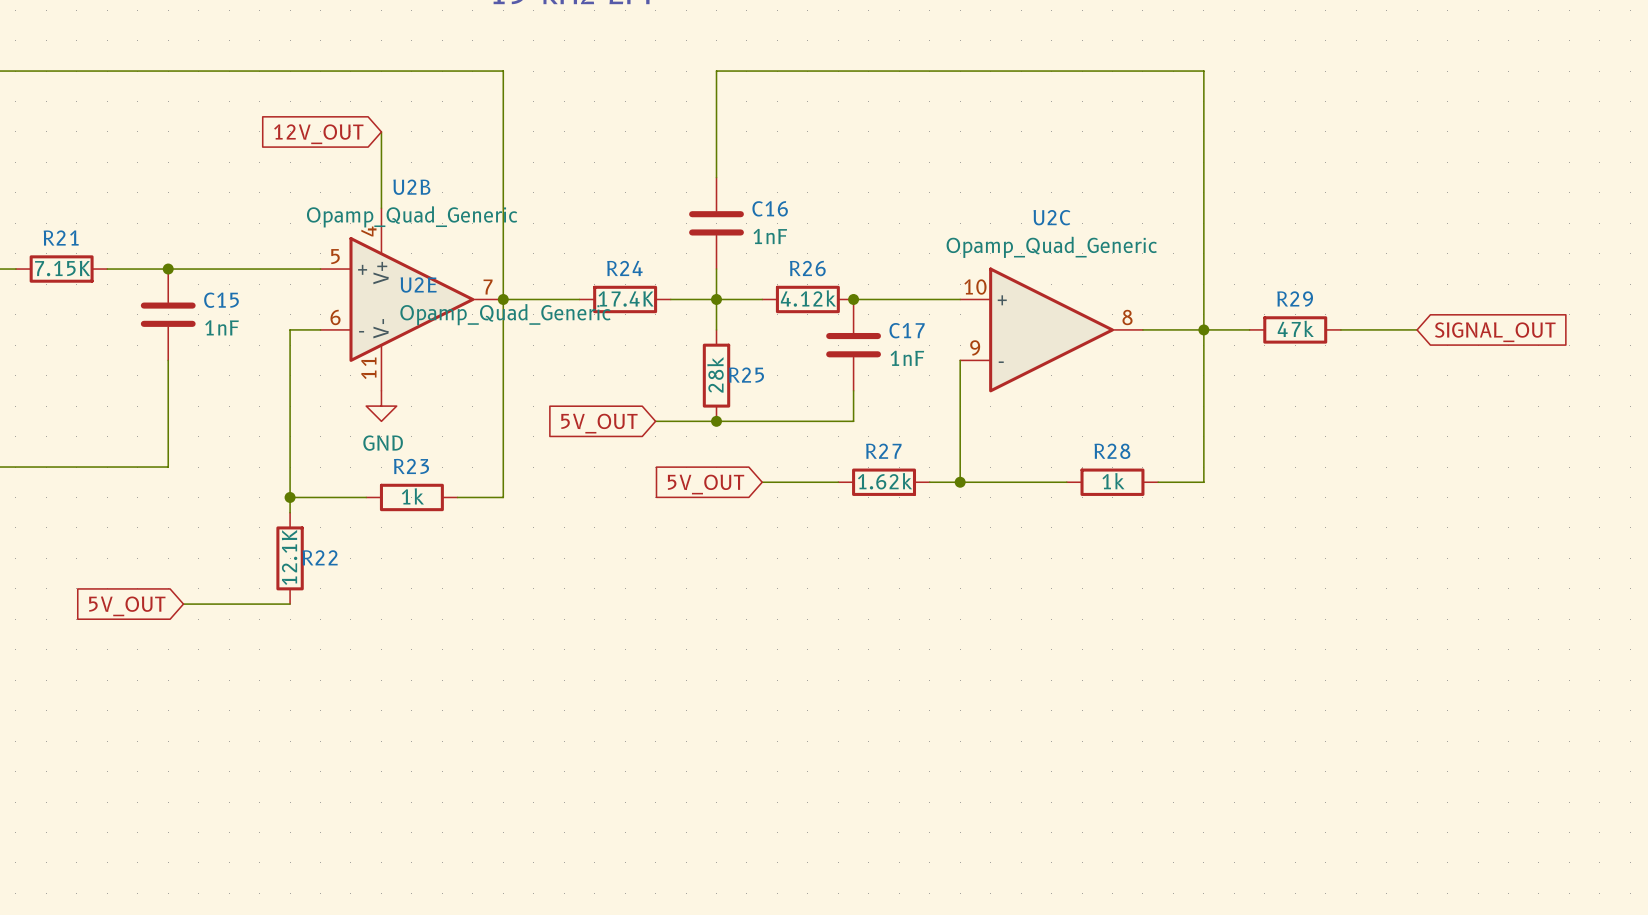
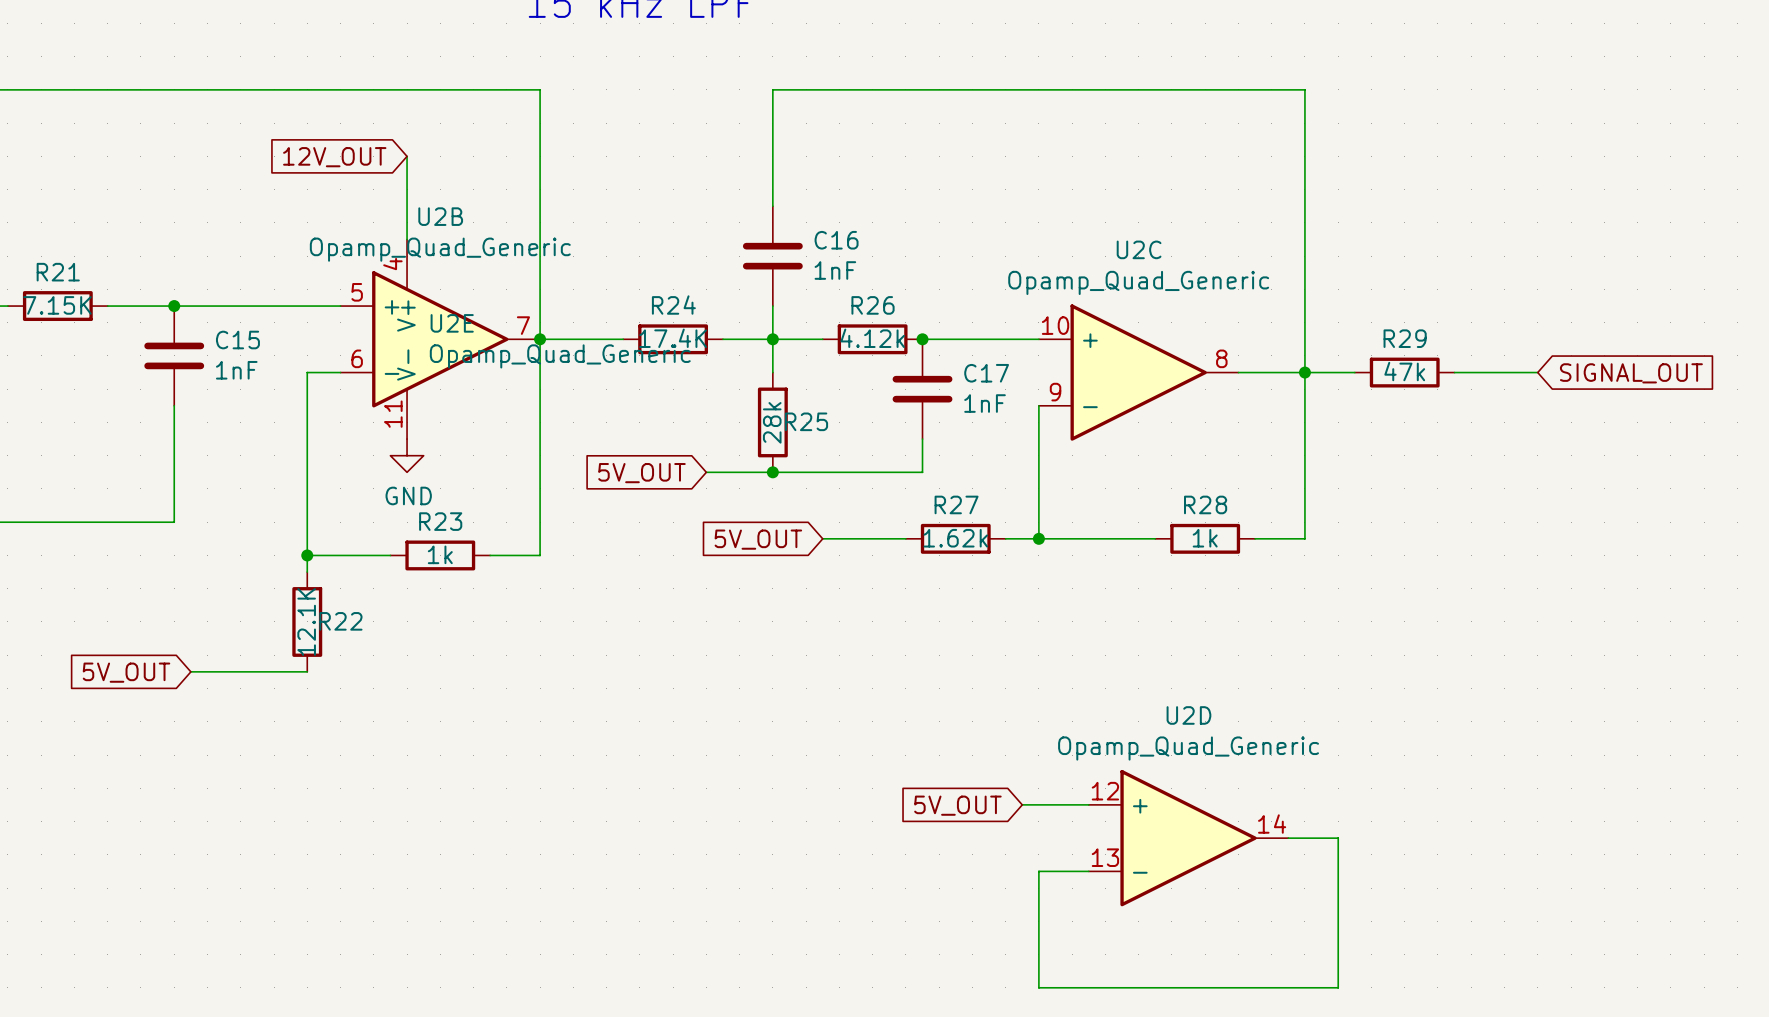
wire: none -> (1022, 804) (1088, 804)
global label: none -> 5V_OUT (957, 805)
U2D: none -> Opamp_Quad_Generic (1188, 838)
wire: none -> (1288, 838) (1338, 838) (1338, 987) (1038, 987) (1038, 871) (1088, 871)

